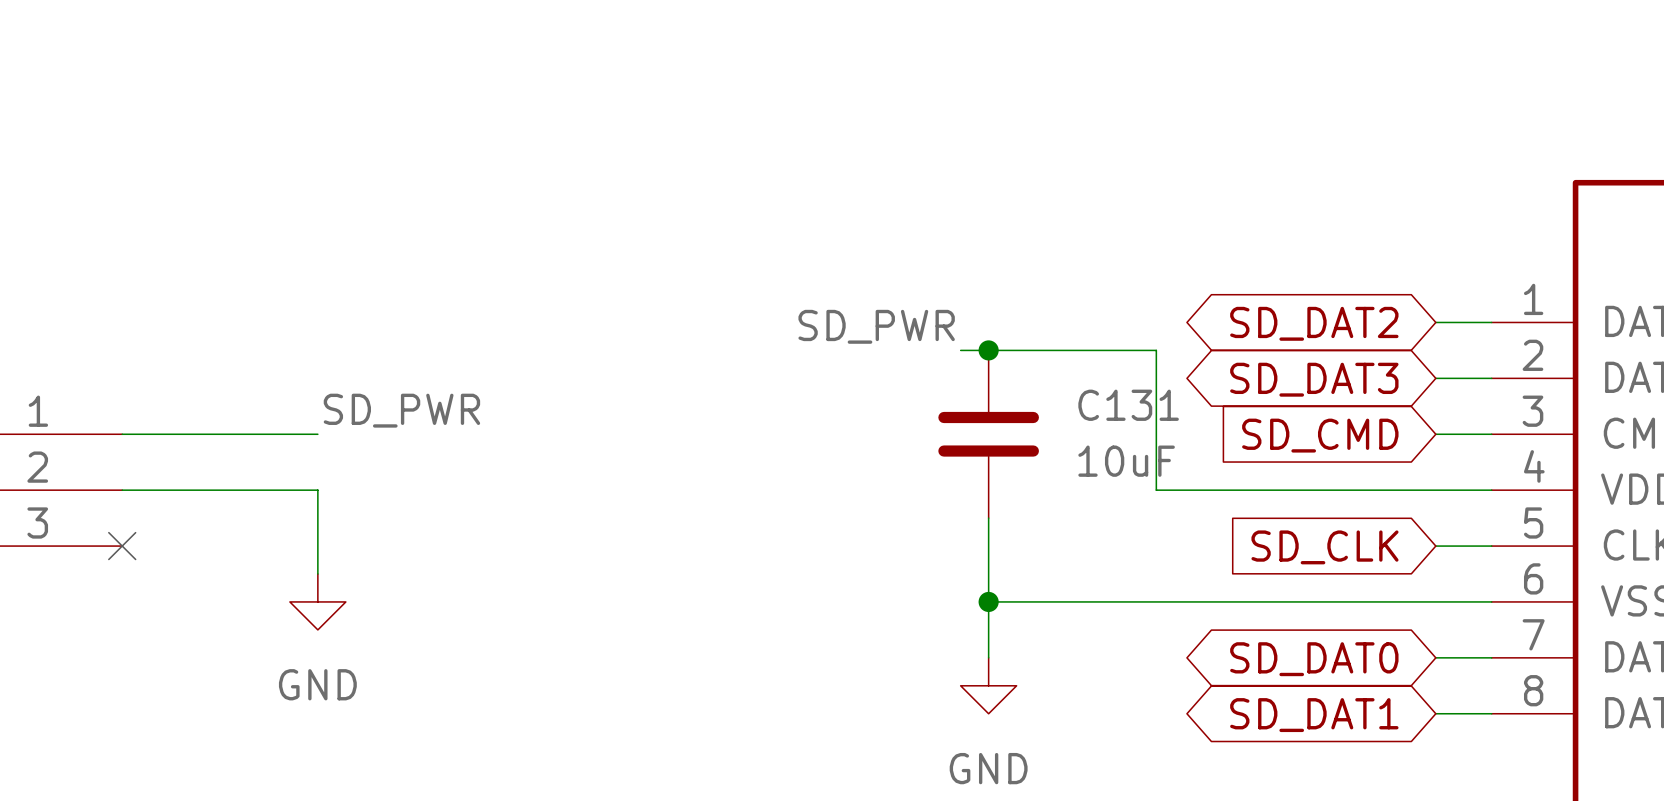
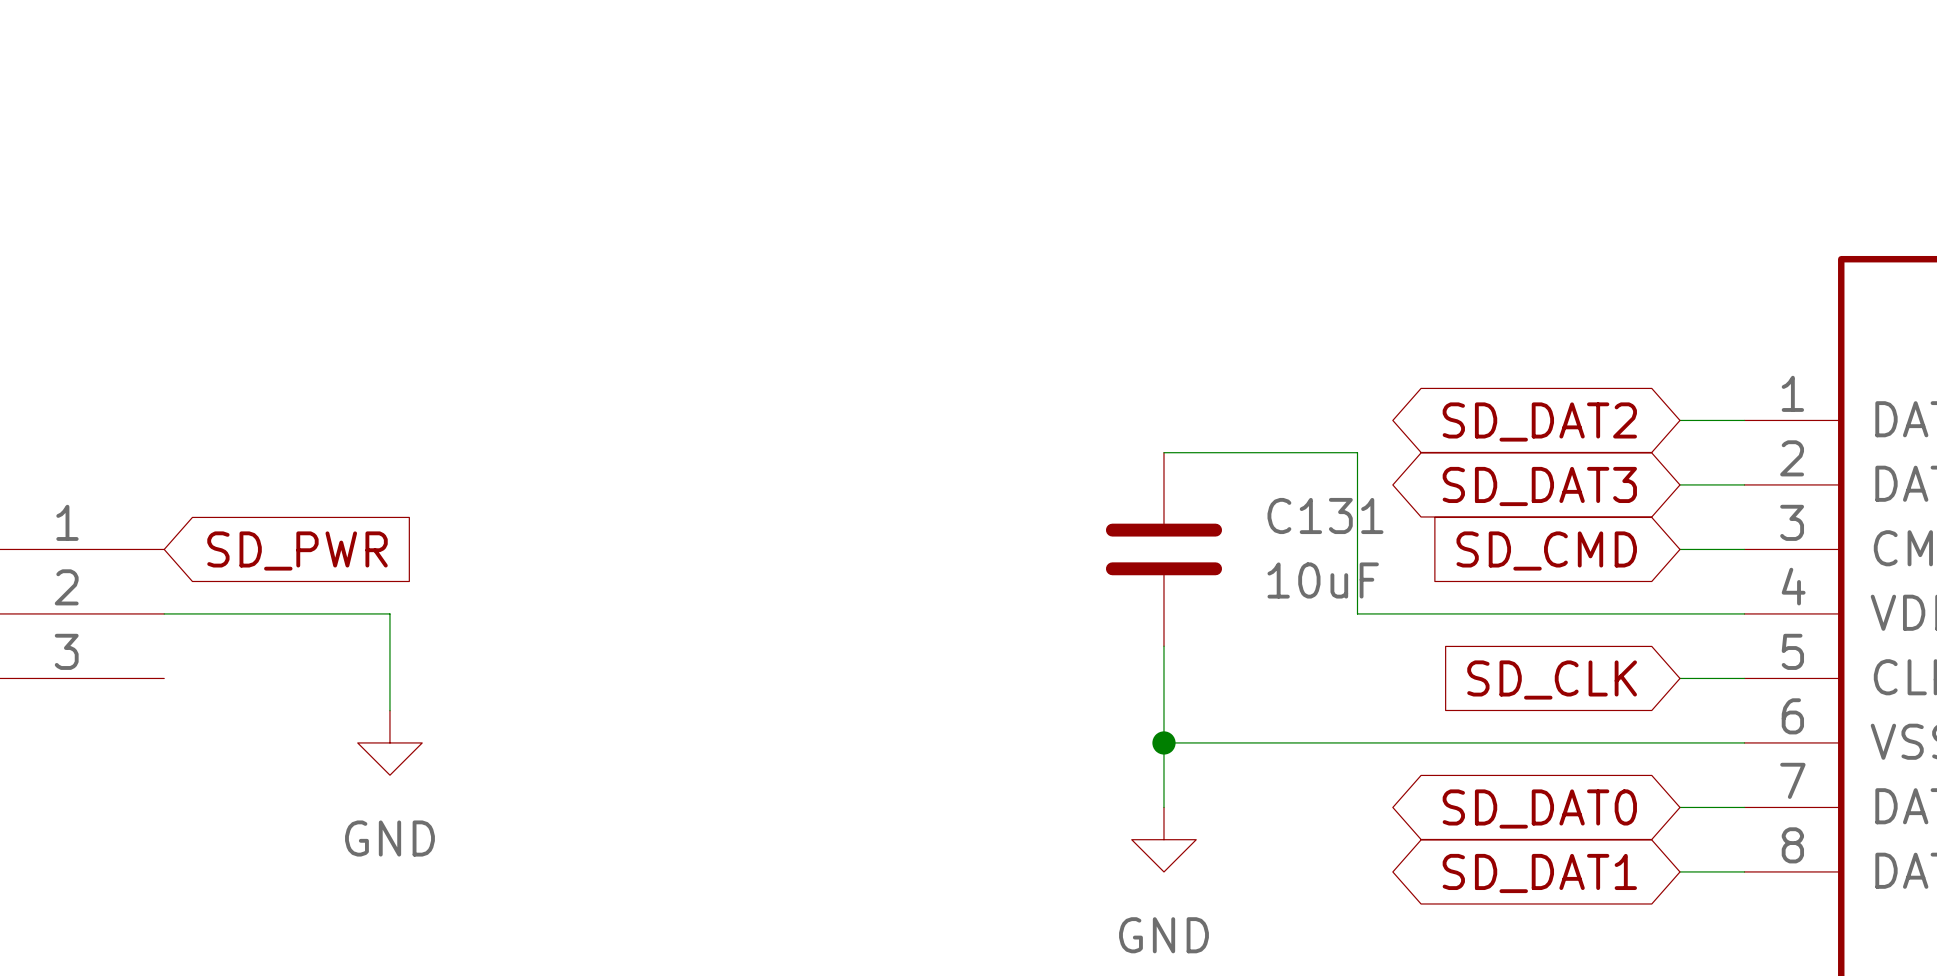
label: SD_PWR (876, 326) -> none
wire: (960, 350) (988, 350) -> none
junction: (988, 350) -> none
label: SD_PWR (401, 410) -> none
wire: (122, 434) (317, 434) -> none
global label: none -> SD_PWR (297, 550)
no-connect mark: (122, 546) -> none

